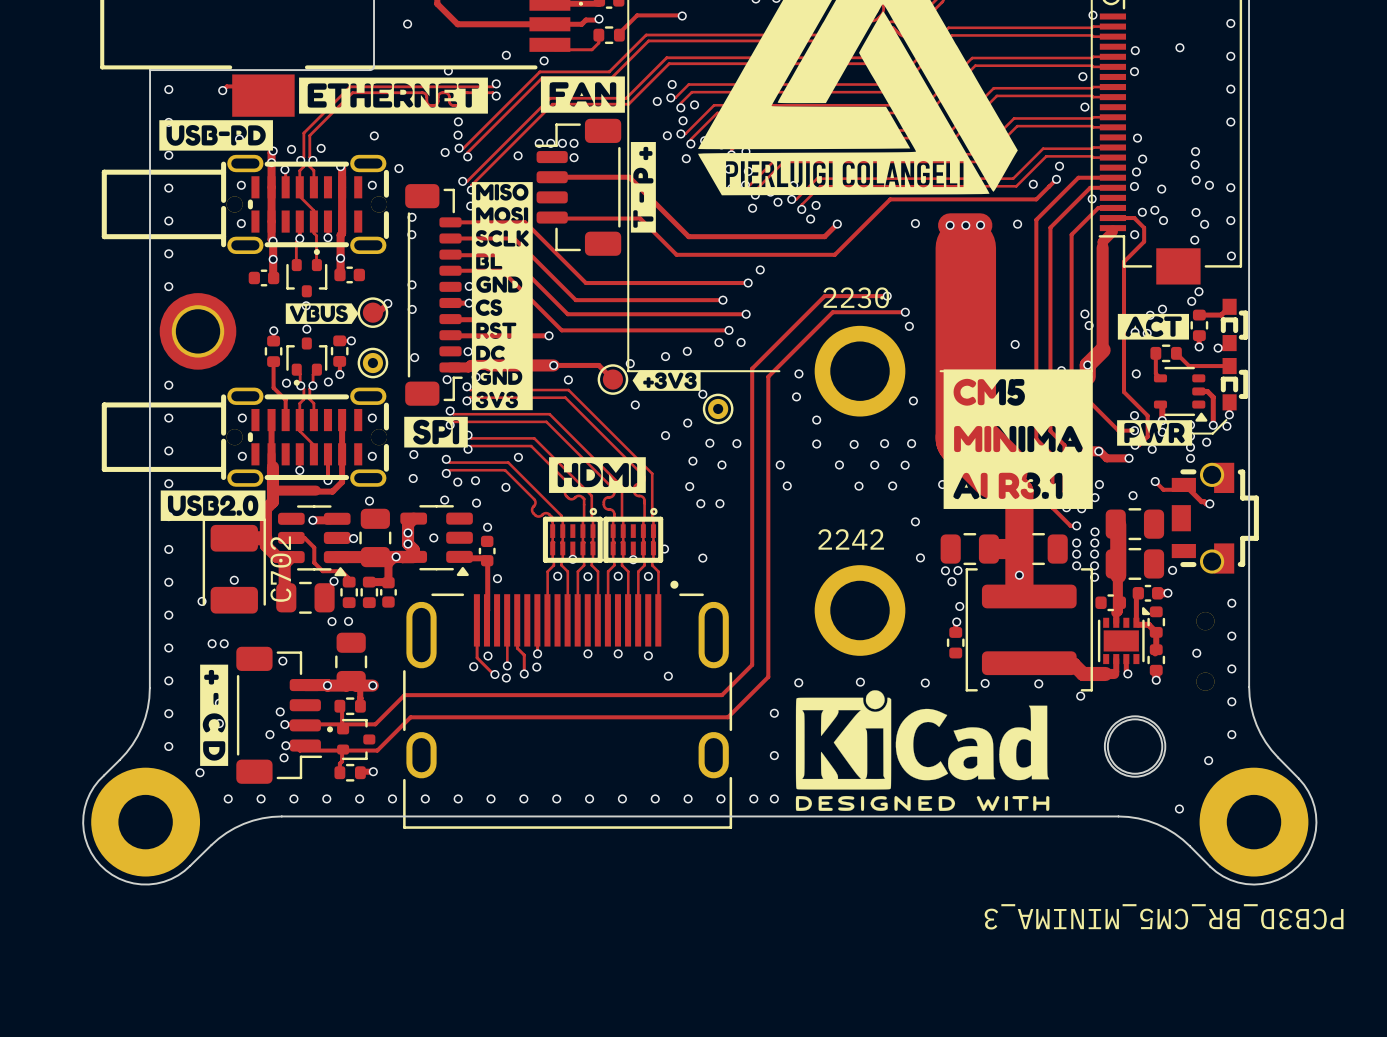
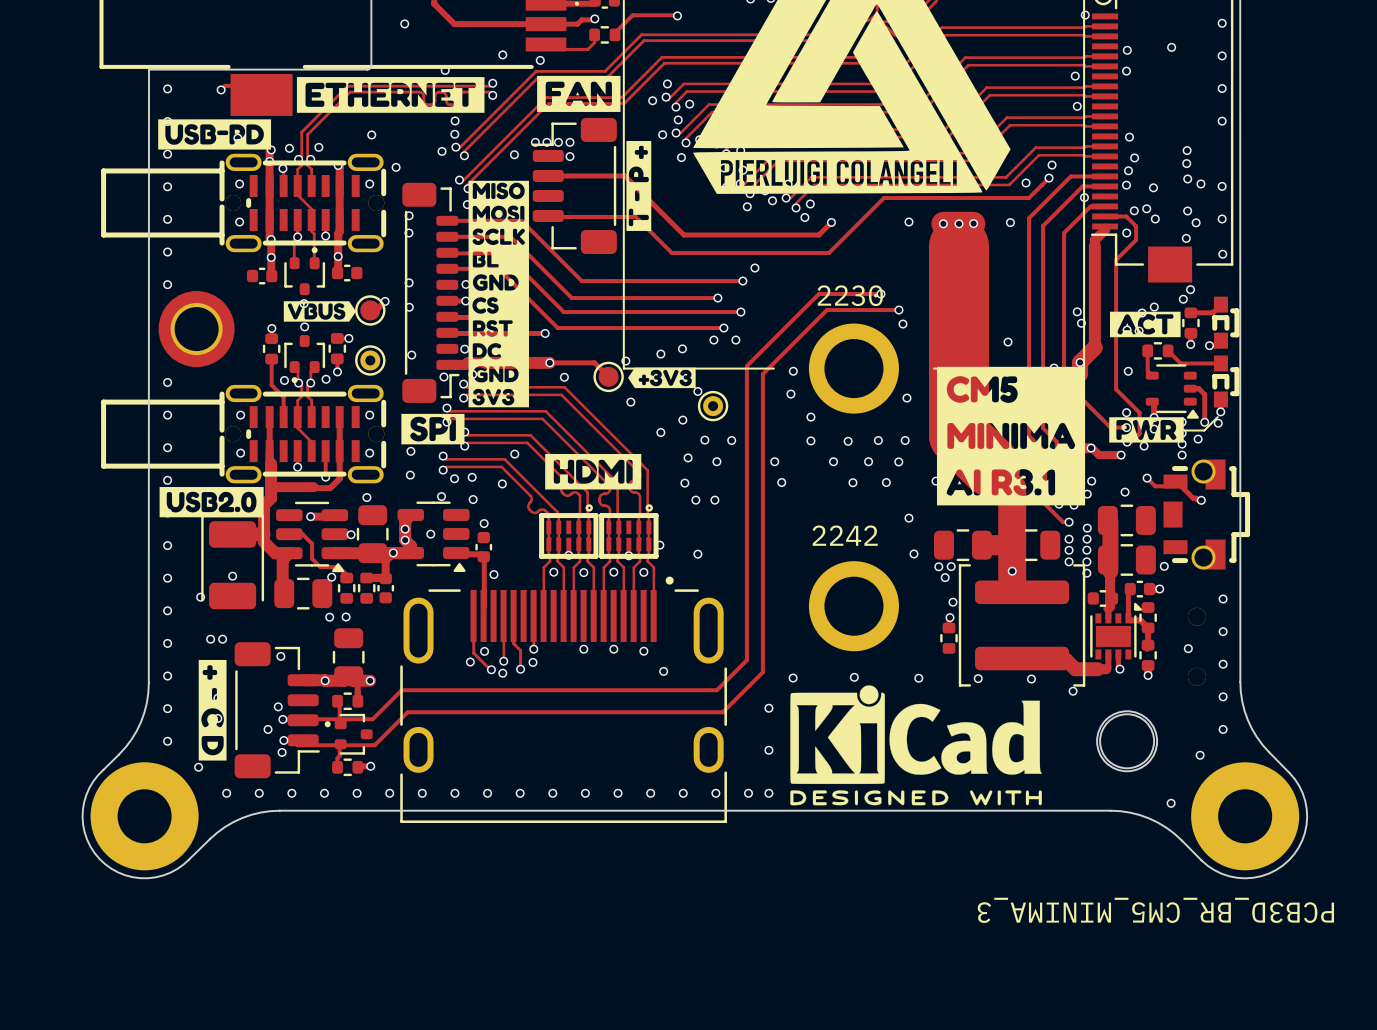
C702 name: C702 (280, 569) -> none

